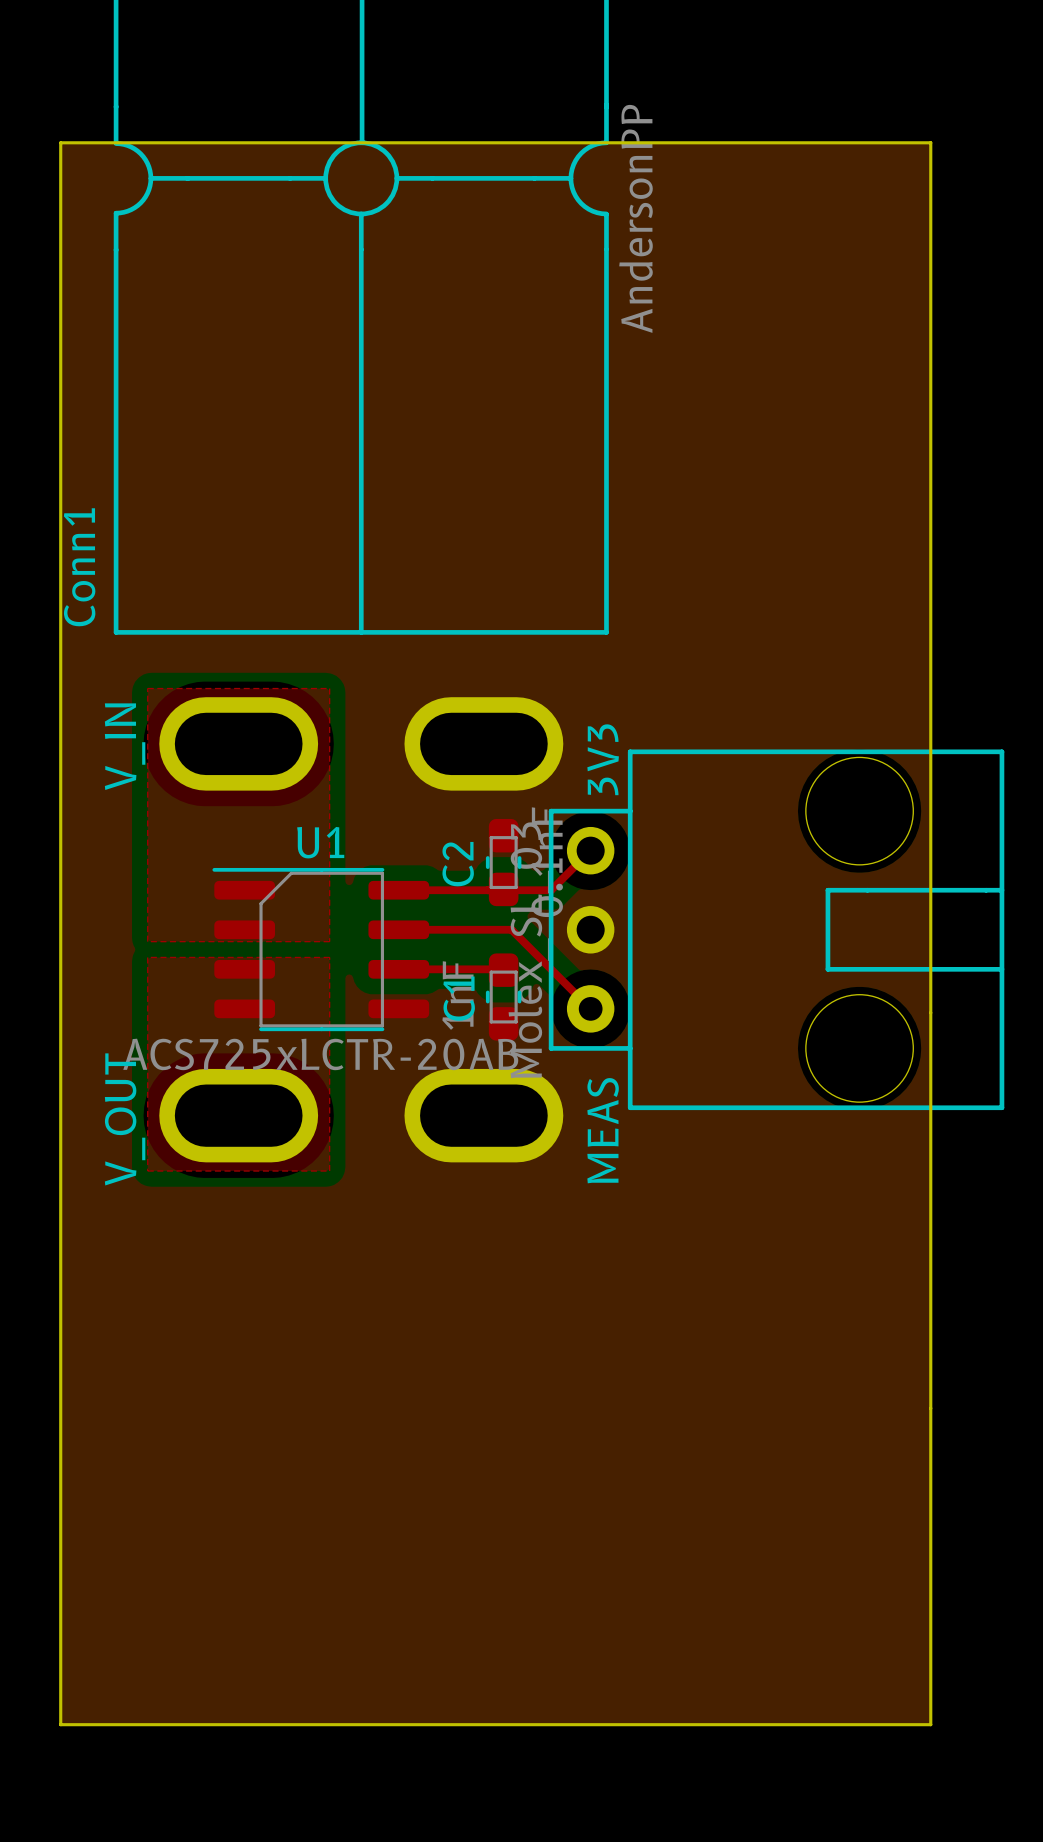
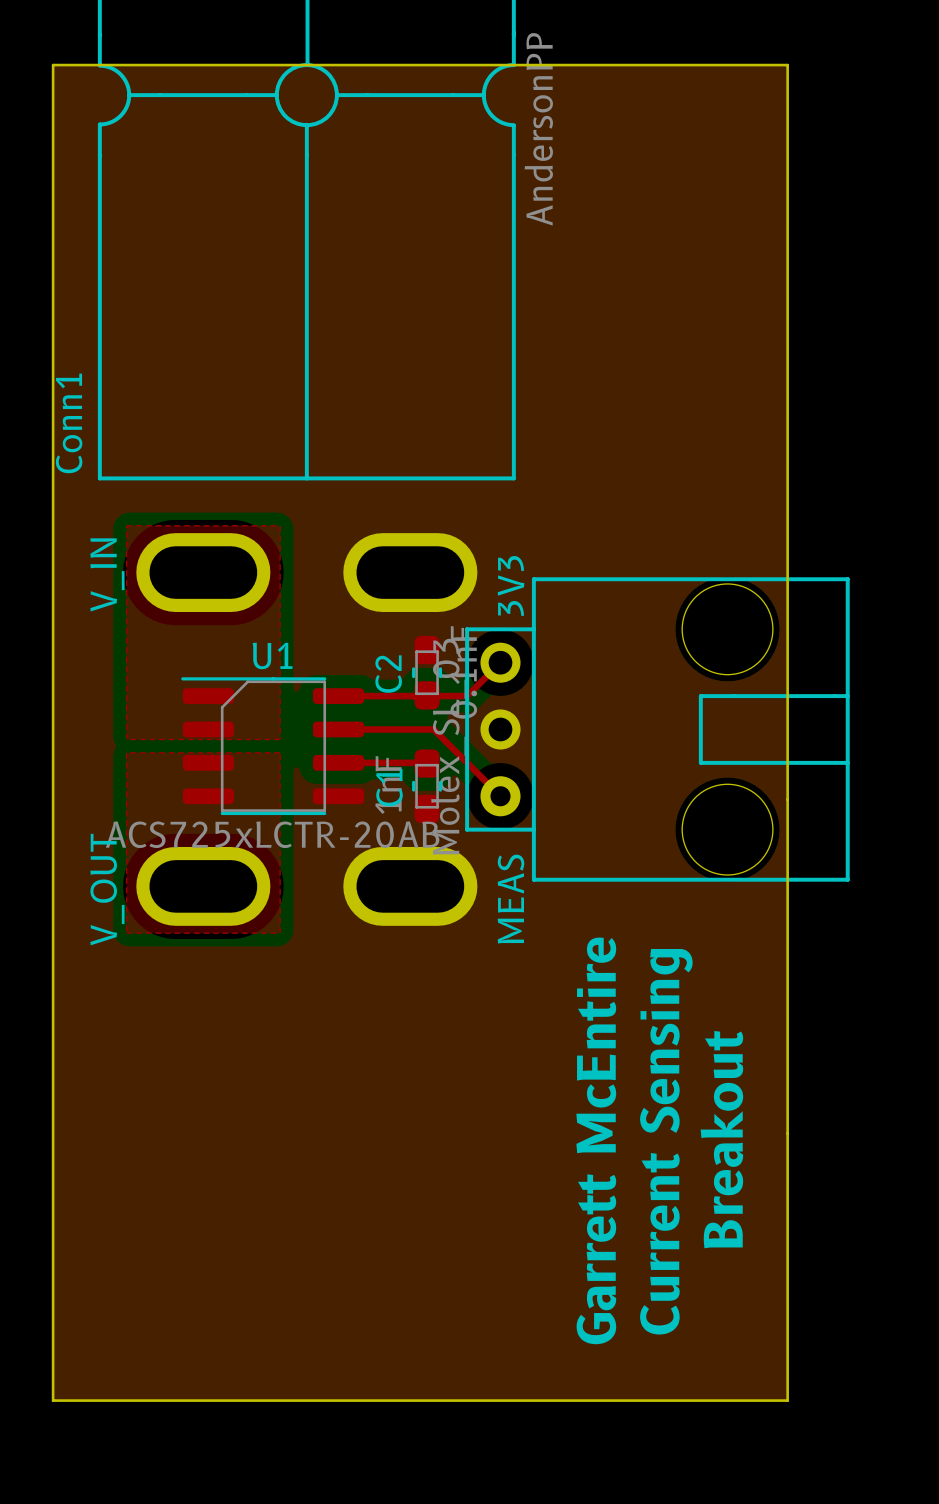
text: none -> Breakout (721, 1139)
text: none -> Garrett McEntire (596, 1140)
text: none -> Current Sensing (666, 1141)

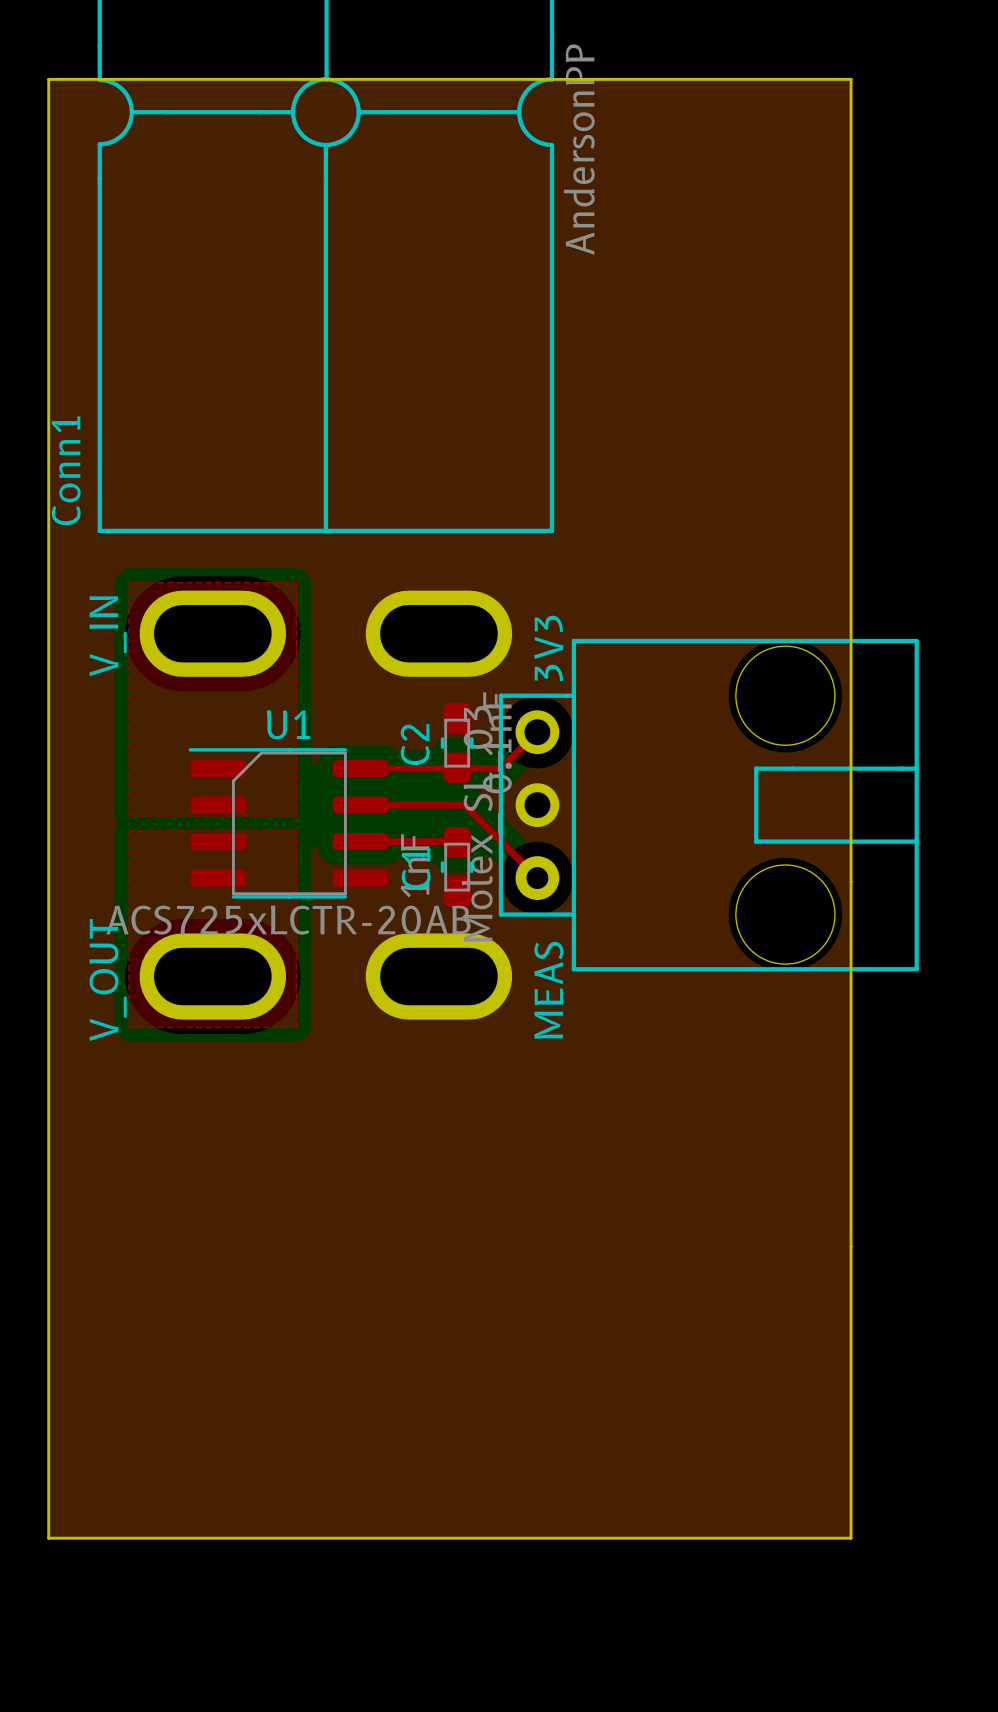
text: Breakout (721, 1139) -> none
text: Garrett McEntire (596, 1140) -> none
text: Current Sensing (666, 1141) -> none

